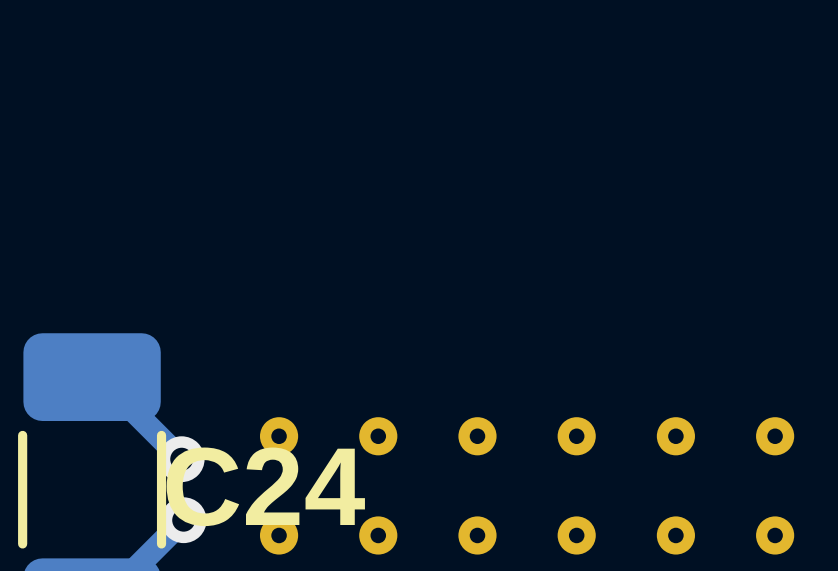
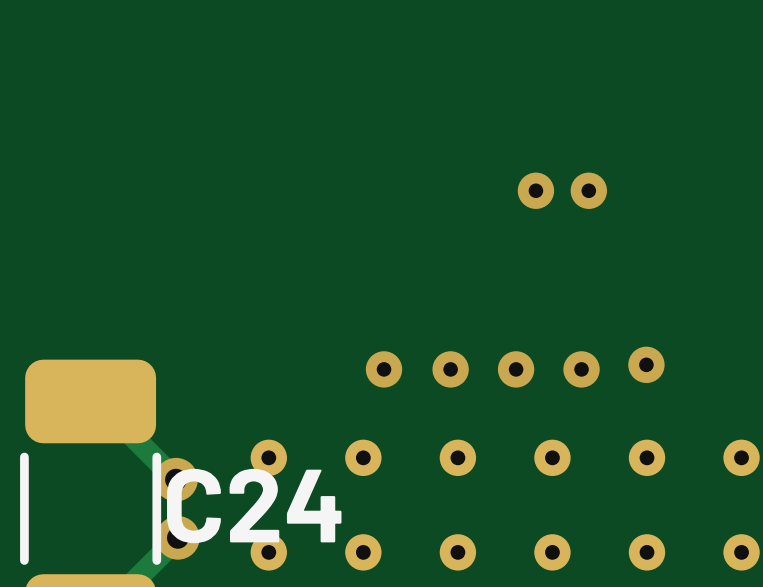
via: none -> (535, 190)
via: none -> (588, 190)
via: none -> (646, 364)
via: none -> (384, 369)
via: none -> (450, 369)
via: none -> (516, 369)
via: none -> (581, 369)

